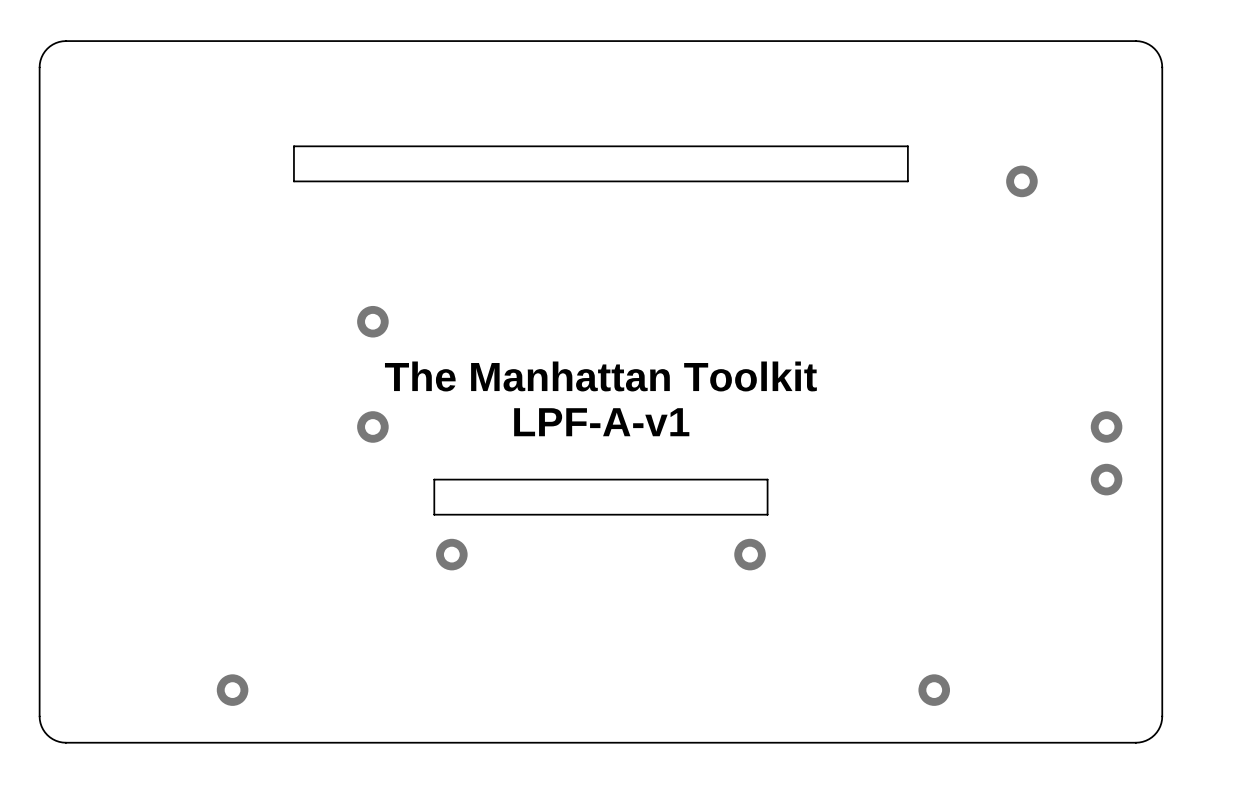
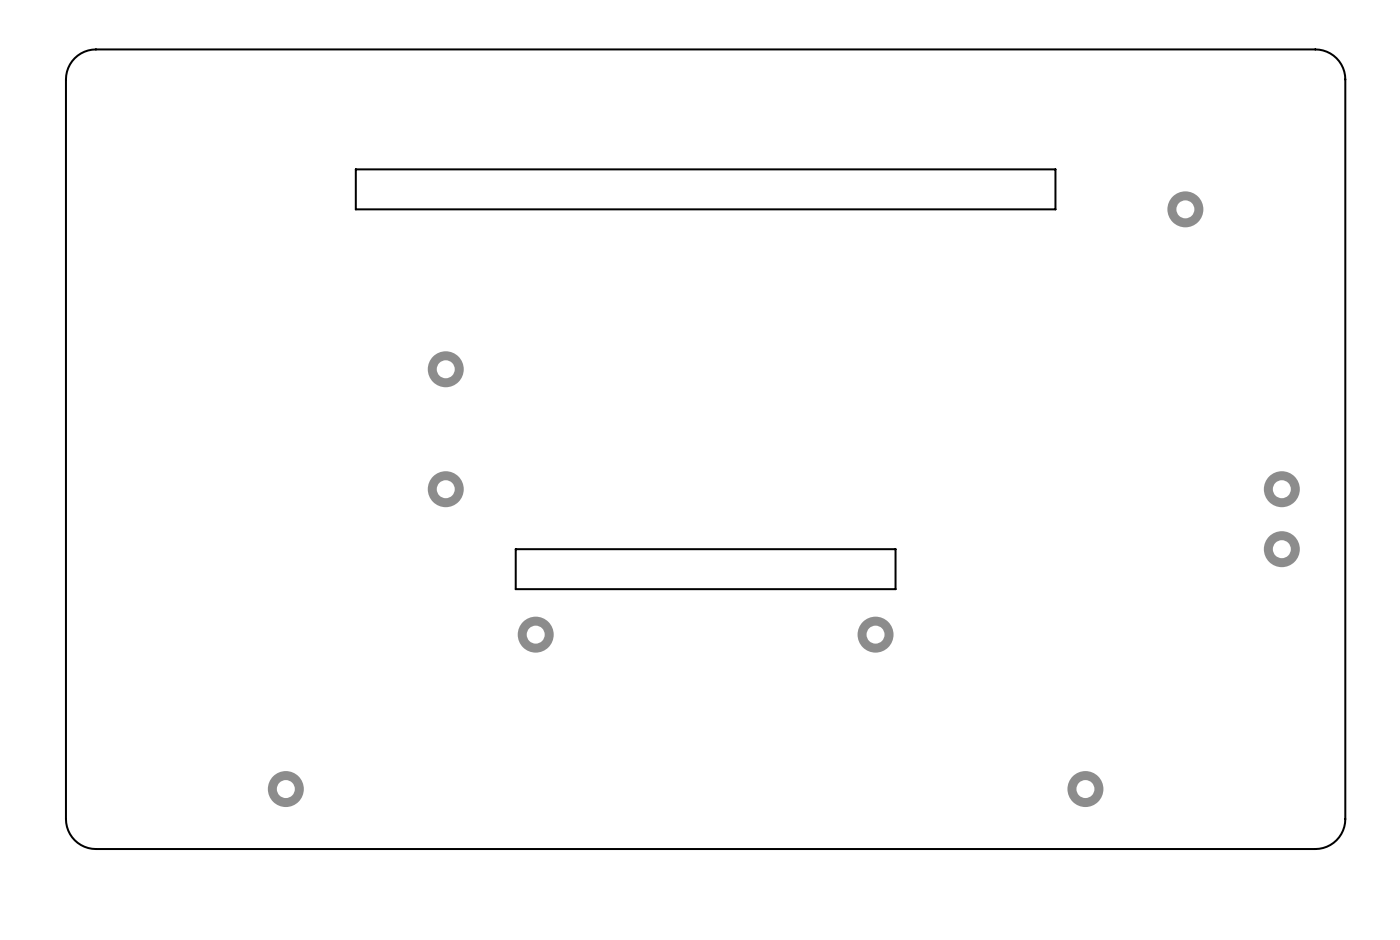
text: The Manhattan Toolkit (600, 376) -> none
text: LPF-A-v1 (601, 422) -> none

